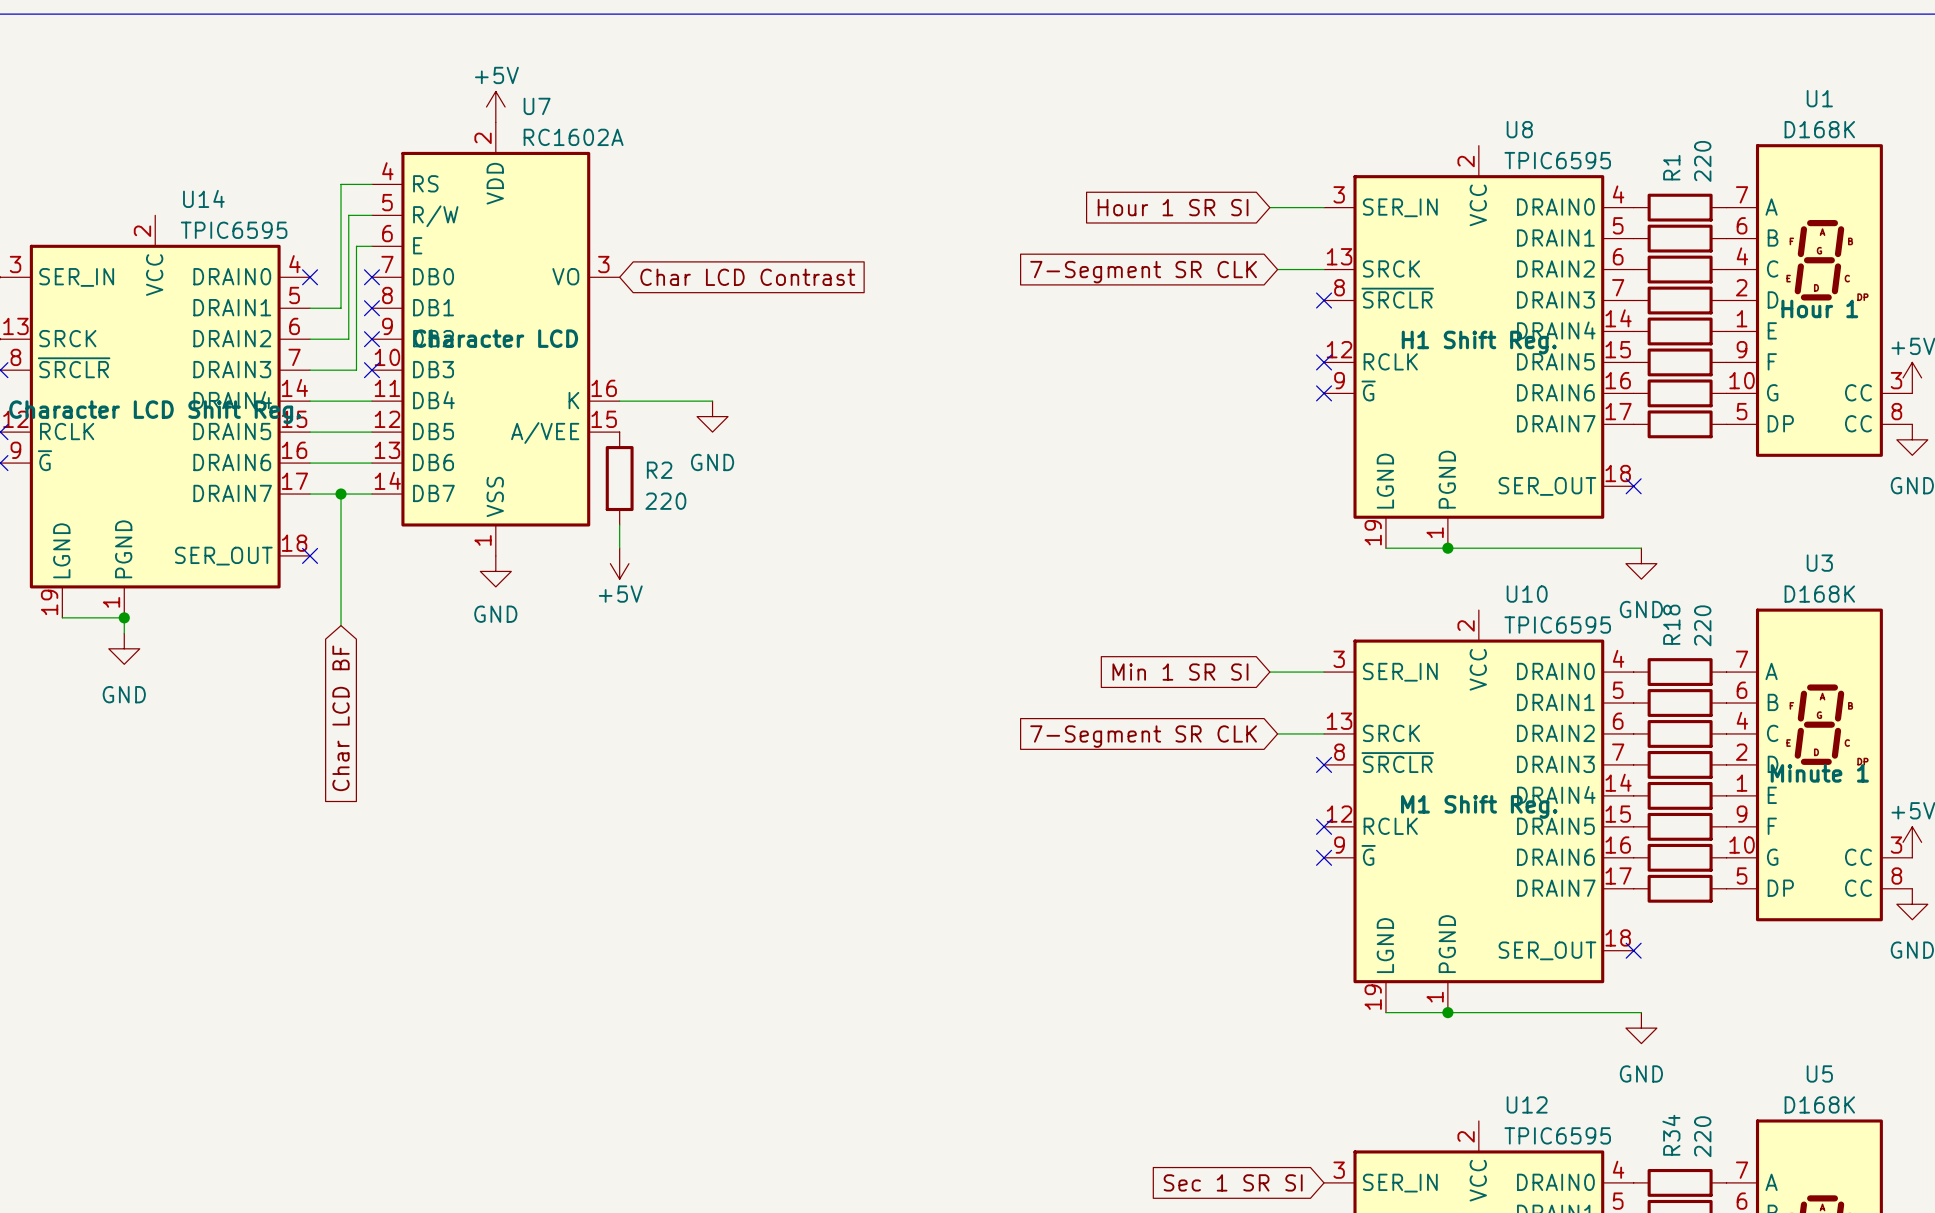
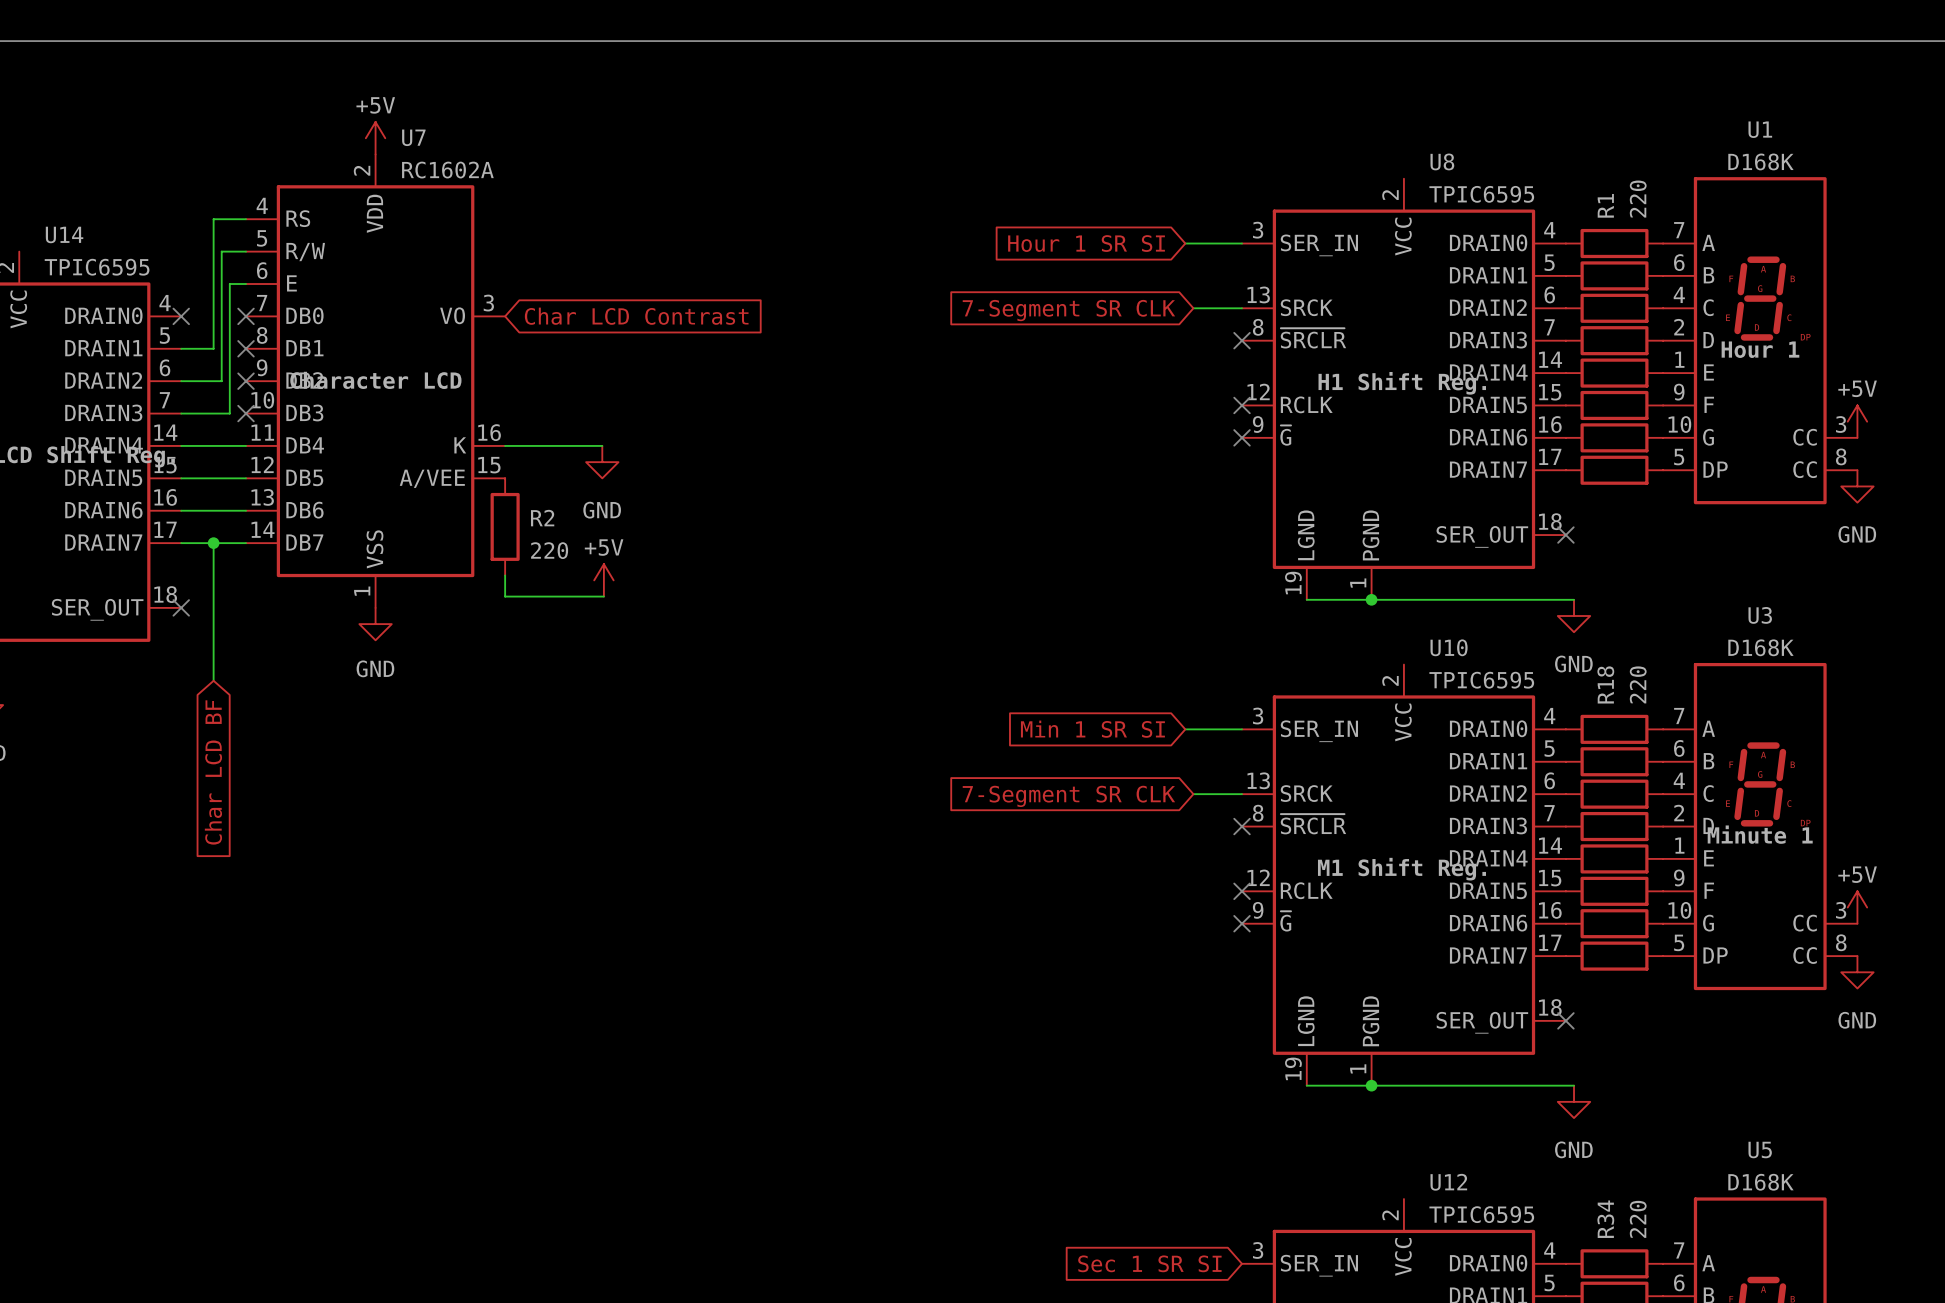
wire: (619, 545) (619, 548) -> (505, 596) (603, 596)
power symbol rotation: 0° (619, 563) -> 180° (603, 580)
power symbol position: +5V (619, 563) -> +5V (603, 580)

